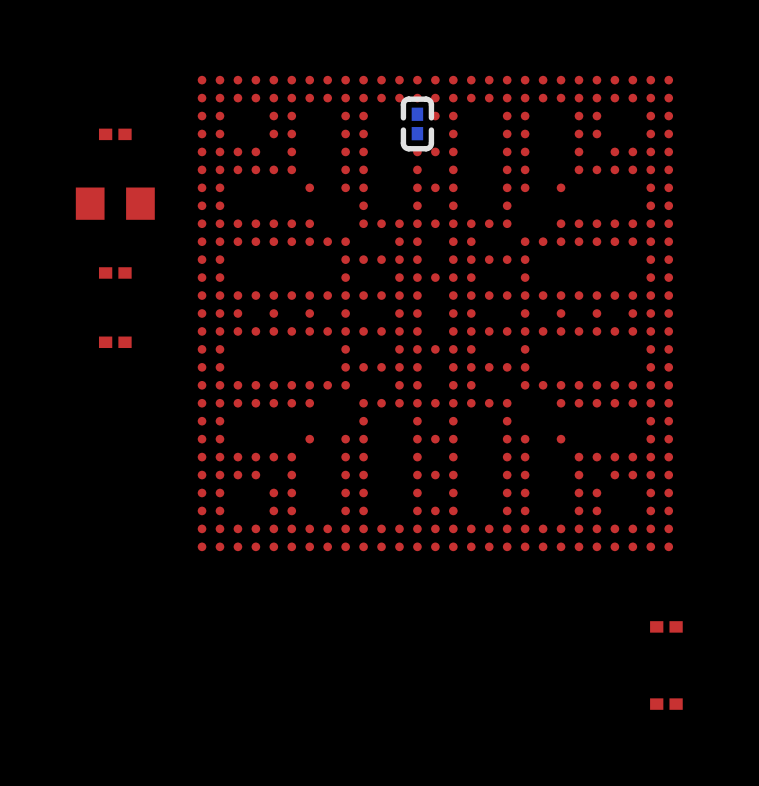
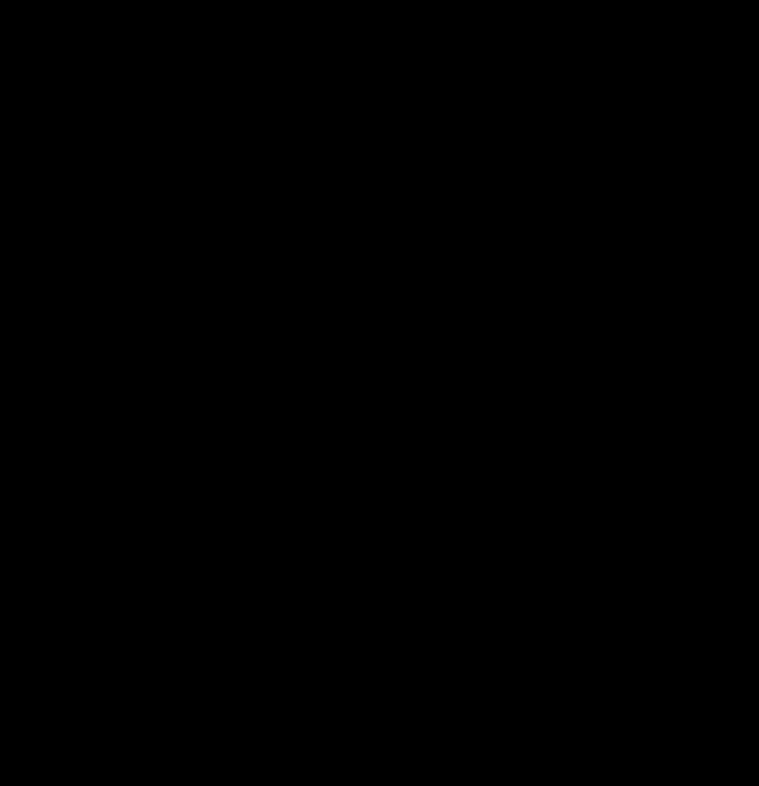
part: (417, 123) -> none
part: (115, 134) -> none
part: (115, 203) -> none
part: (115, 272) -> none
part: (435, 313) -> none
part: (115, 342) -> none
part: (666, 626) -> none
part: (666, 704) -> none

